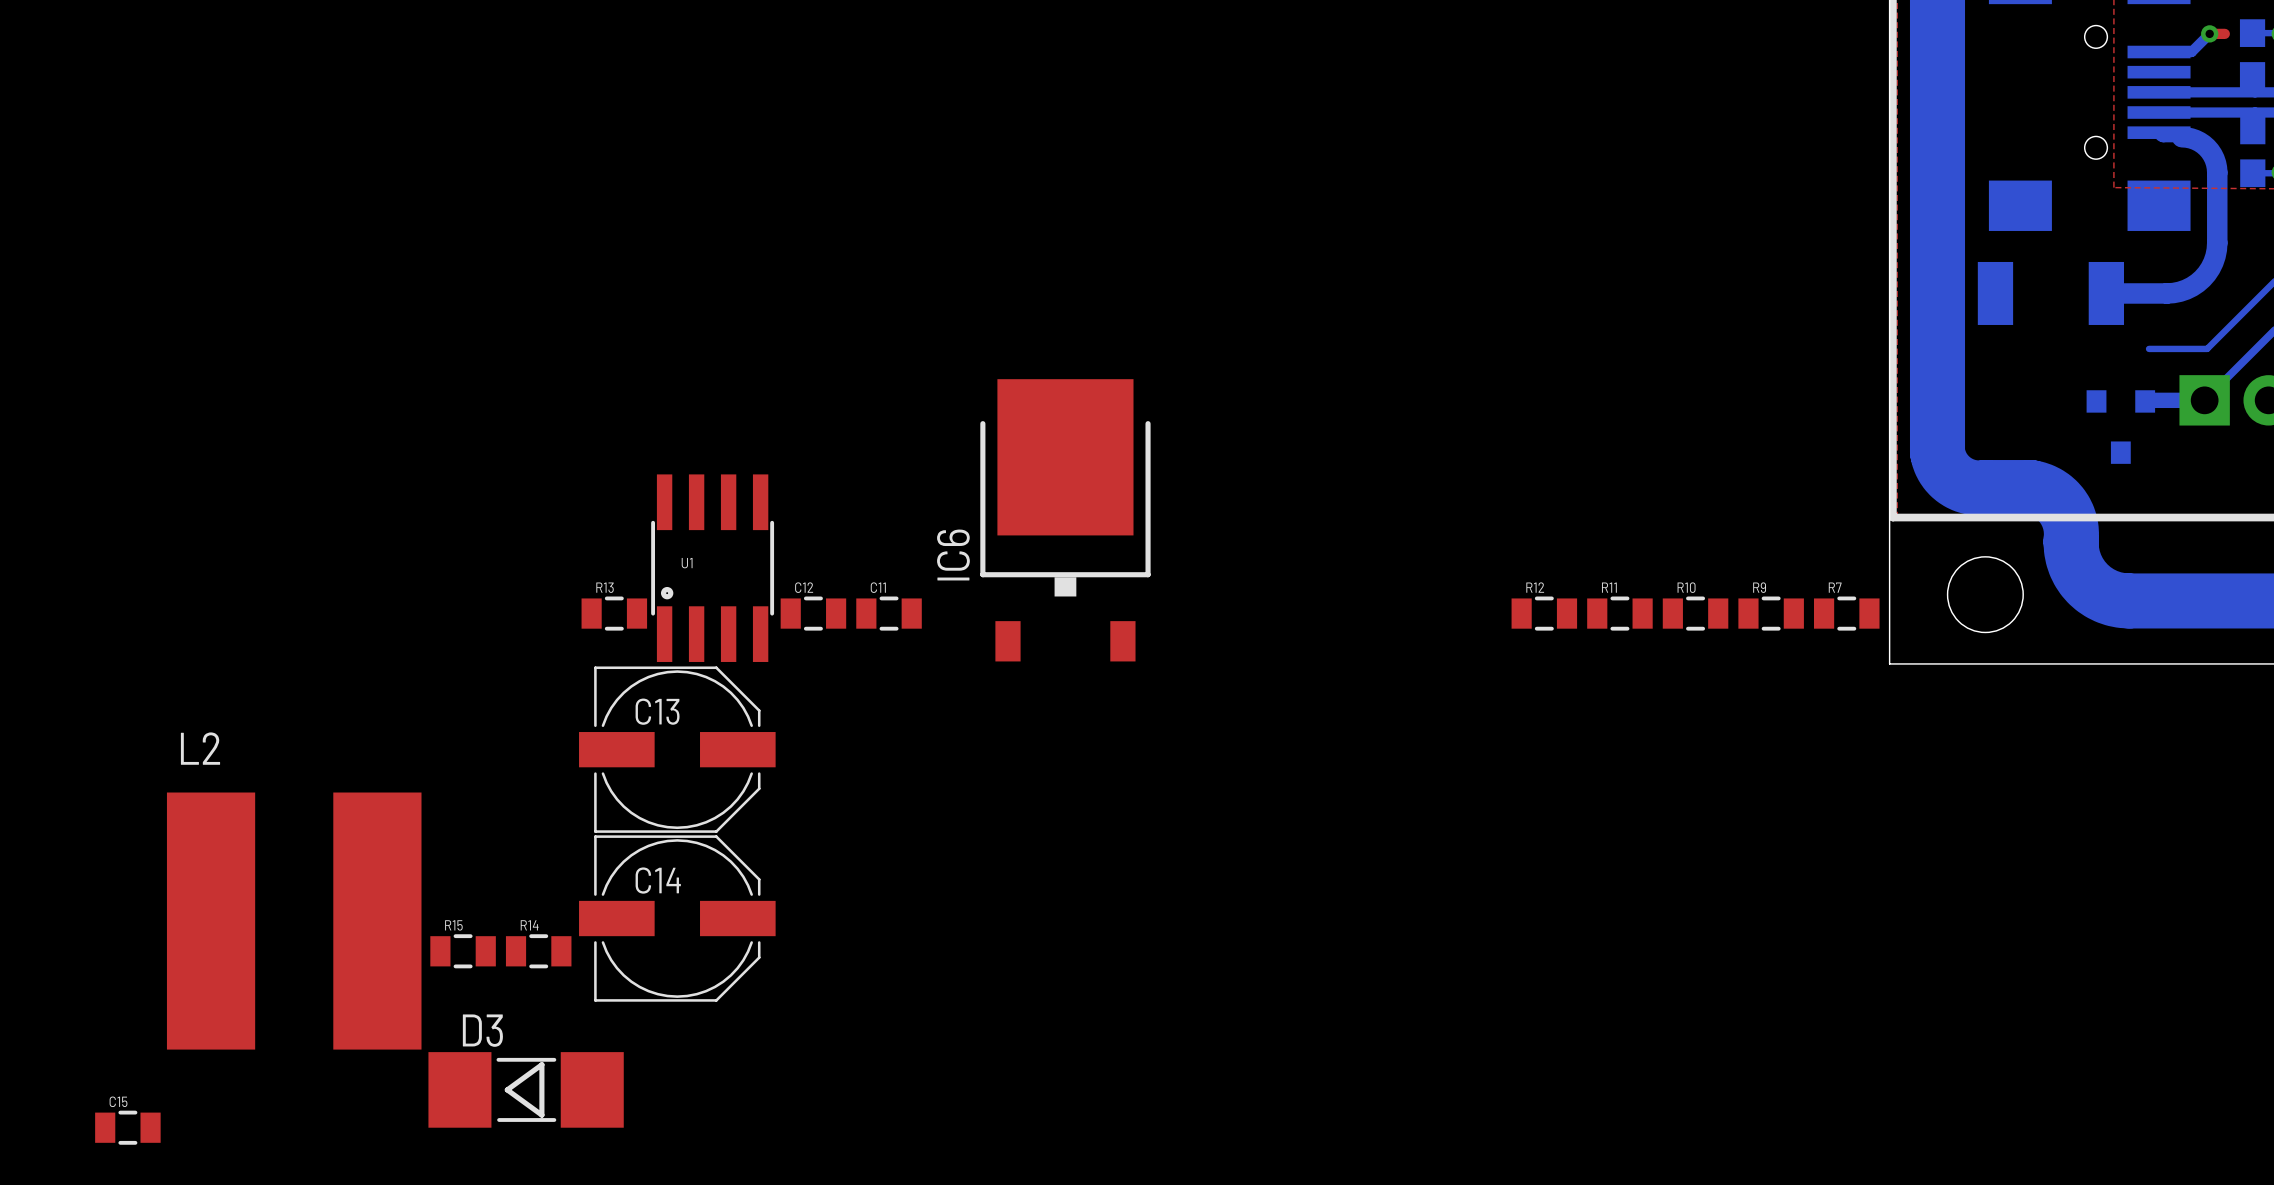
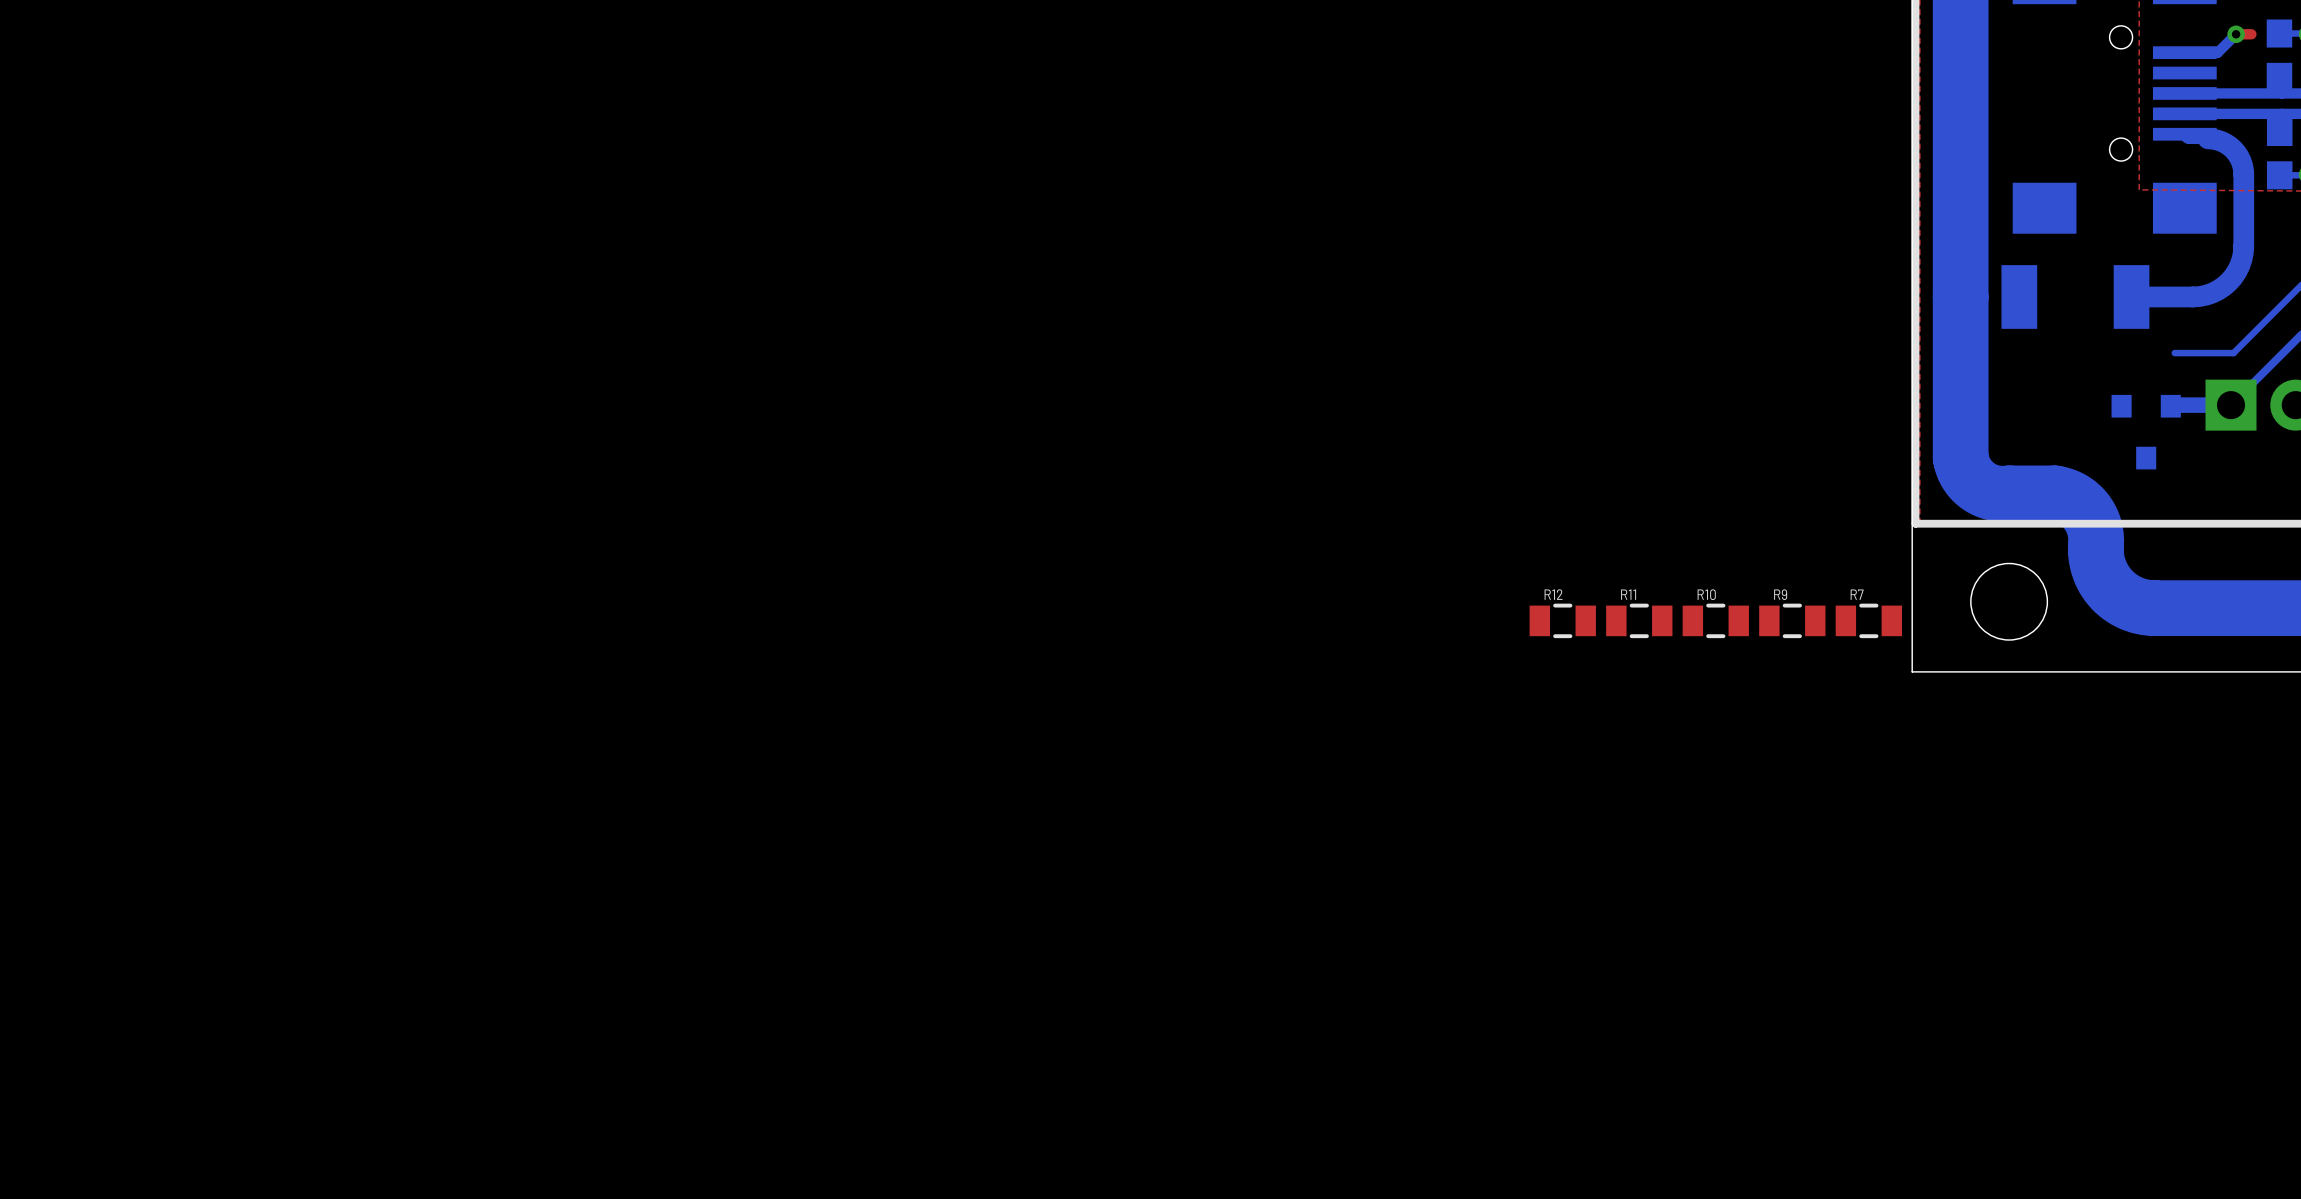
IC6: (1065, 520) -> none
U1: (712, 568) -> none
R13: (614, 613) -> none
C12: (813, 613) -> none
C11: (889, 613) -> none
C13: (677, 749) -> none
C14: (677, 918) -> none
L2: (294, 921) -> none
R15: (463, 951) -> none
R14: (538, 951) -> none
D3: (526, 1089) -> none
C15: (127, 1127) -> none

